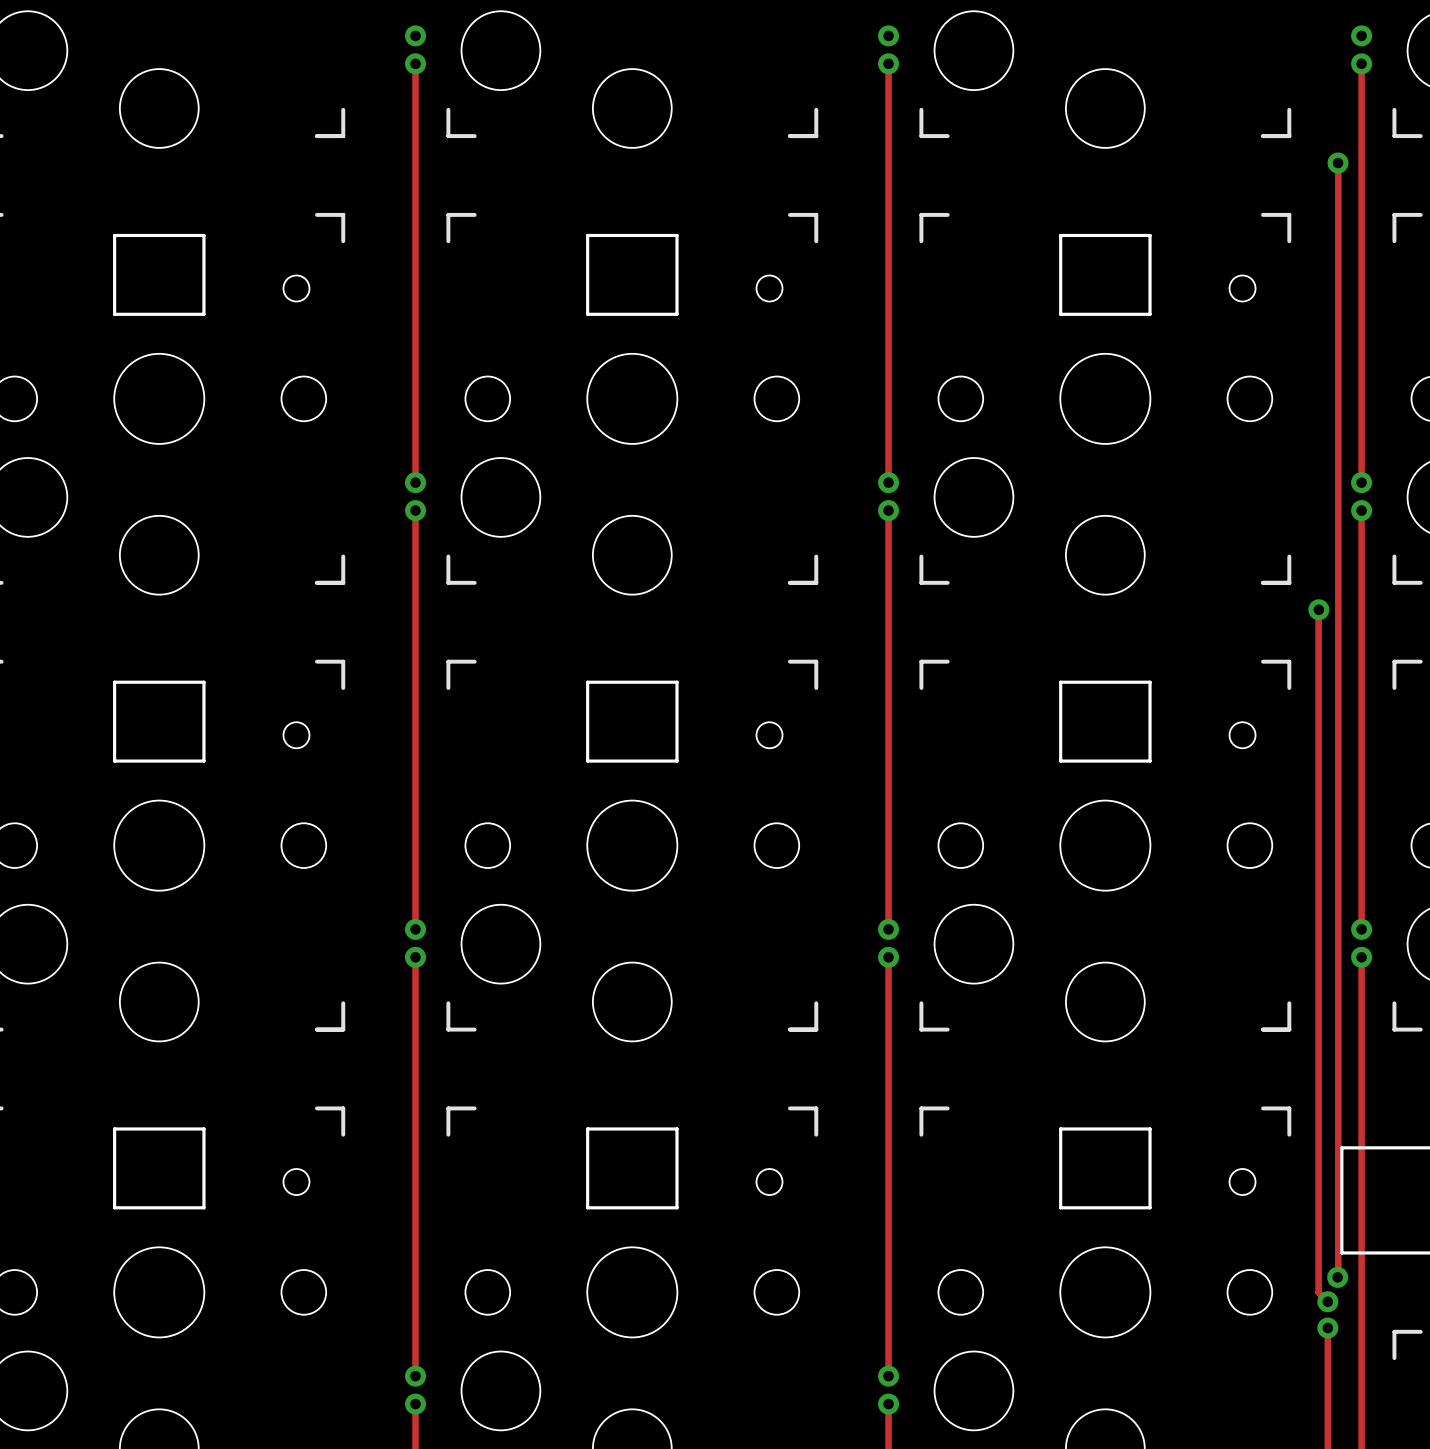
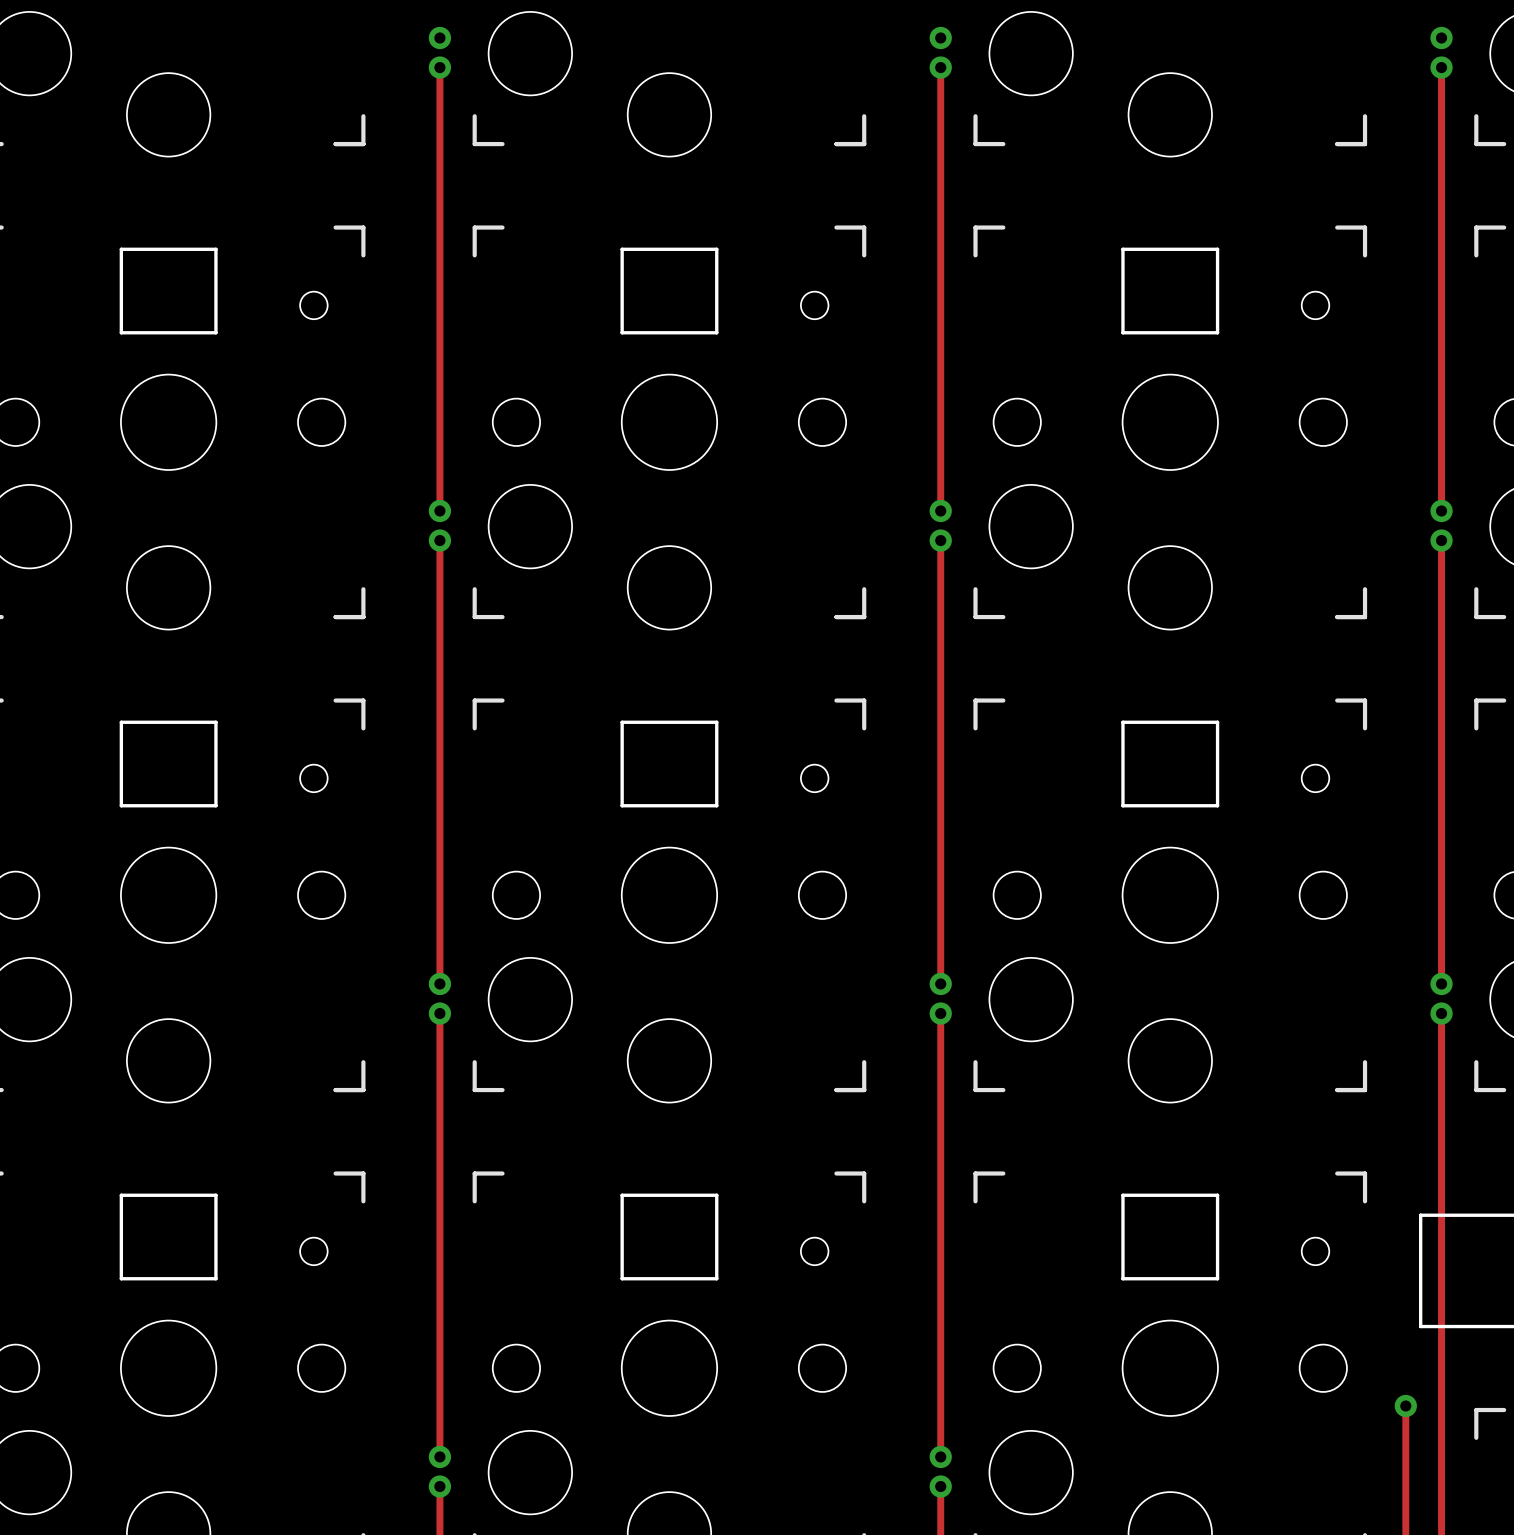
track: (1338, 163) (1337, 1277) -> none
via: (1338, 163) -> none
via: (1318, 609) -> none
track: (1318, 610) (1318, 1292) (1327, 1301) -> none
via: (1337, 1277) -> none
via: (1327, 1301) -> none

